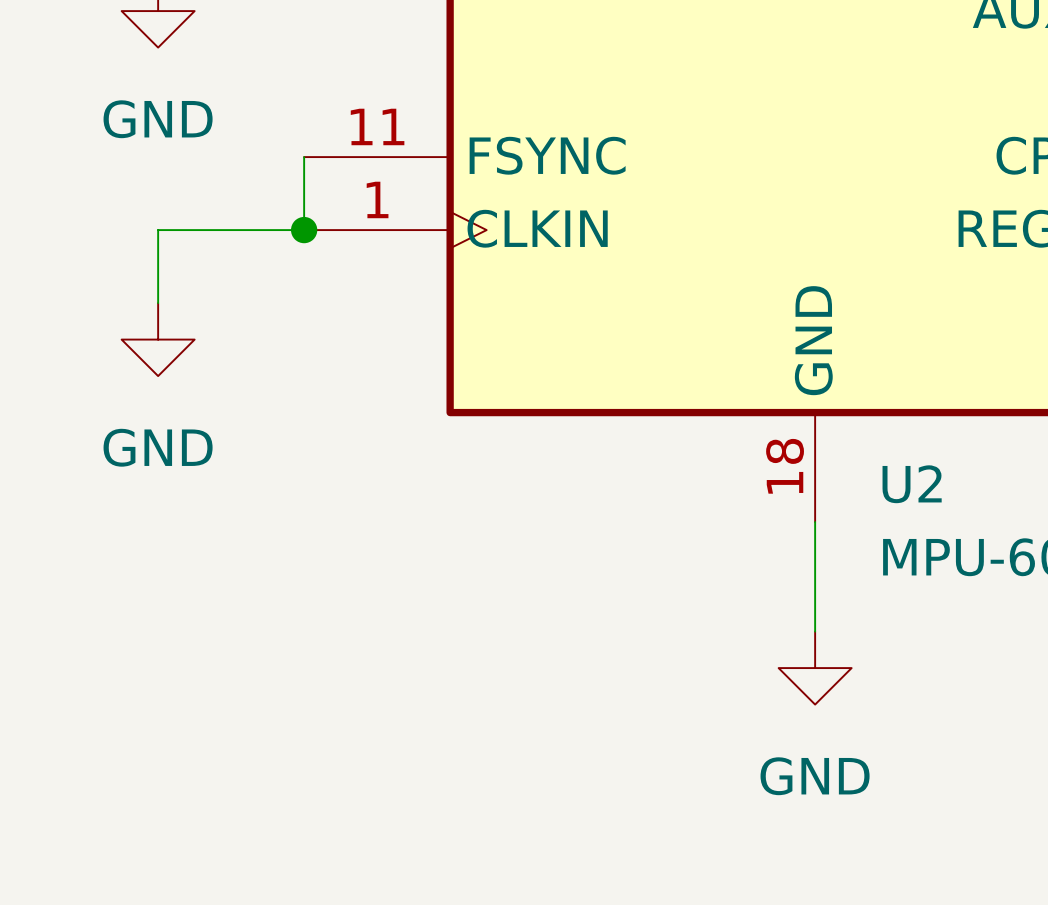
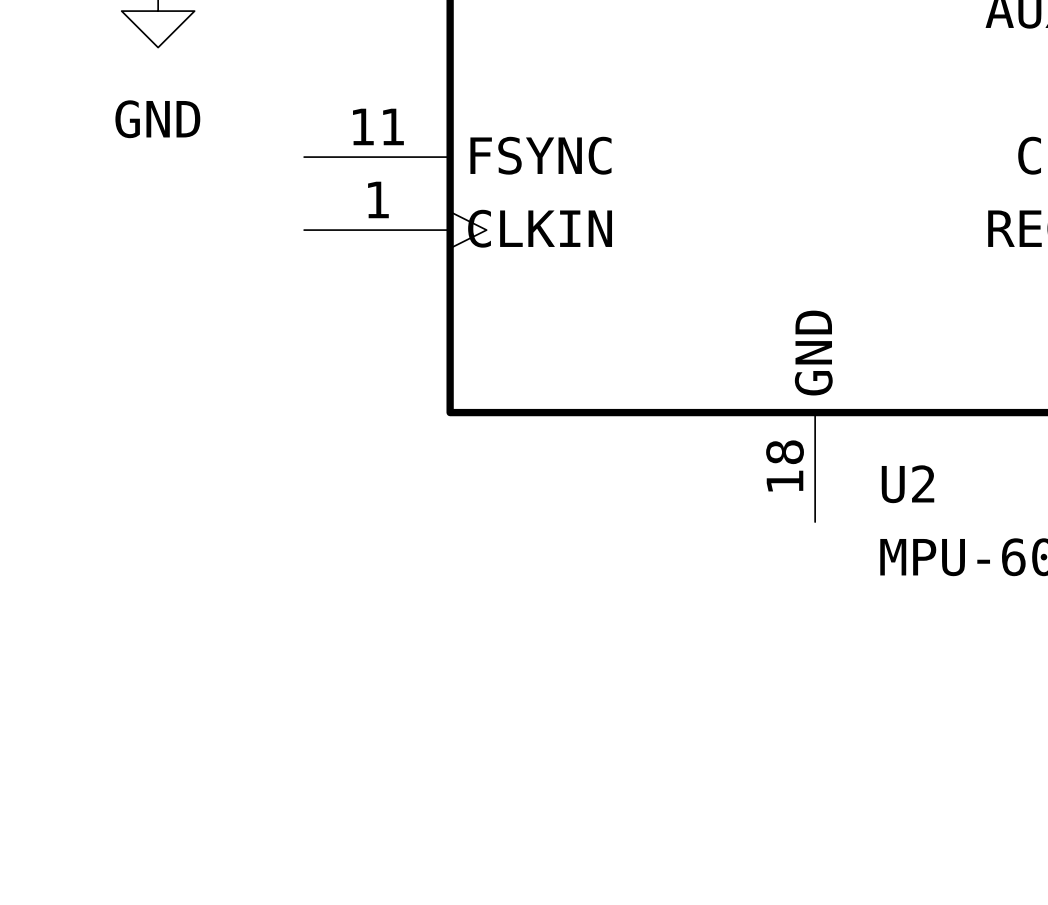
wire: (304, 157) (304, 230) (158, 230) (158, 303) -> none
junction: (304, 230) -> none
power symbol: GND (158, 339) -> none
wire: (815, 522) (815, 631) -> none
power symbol: GND (815, 668) -> none

